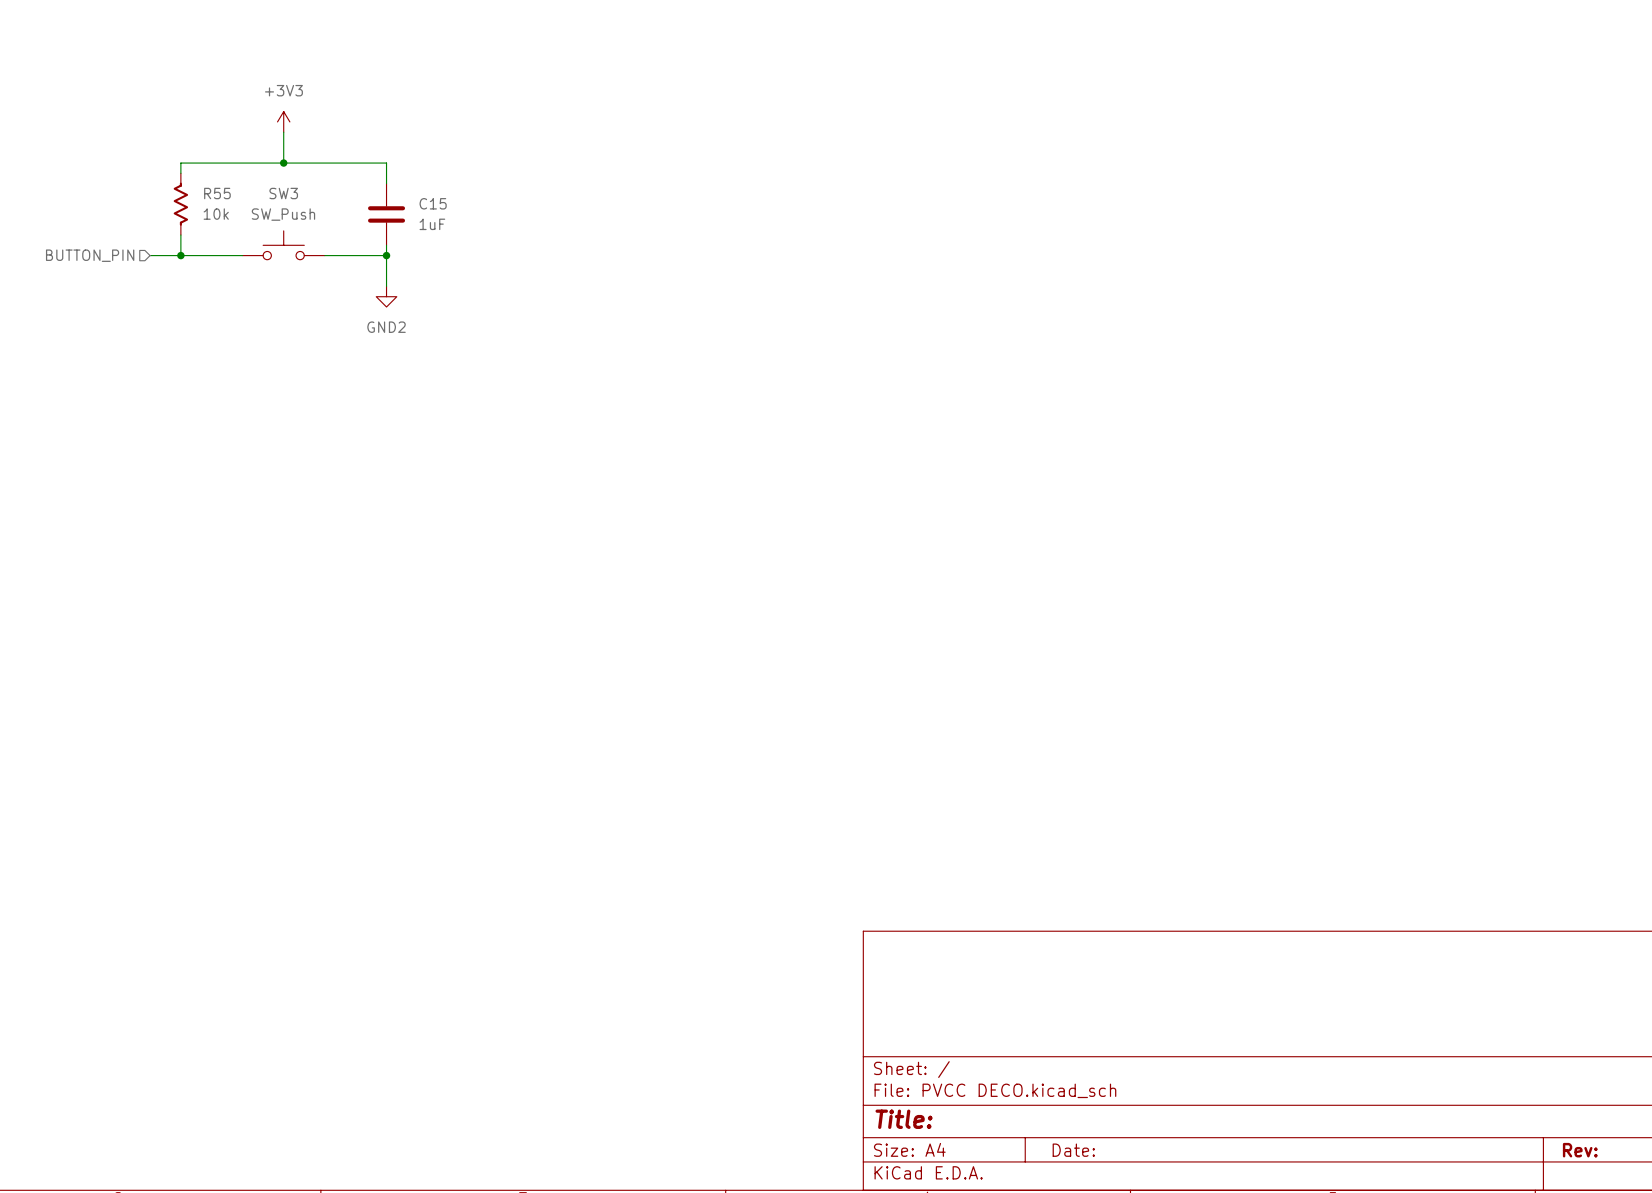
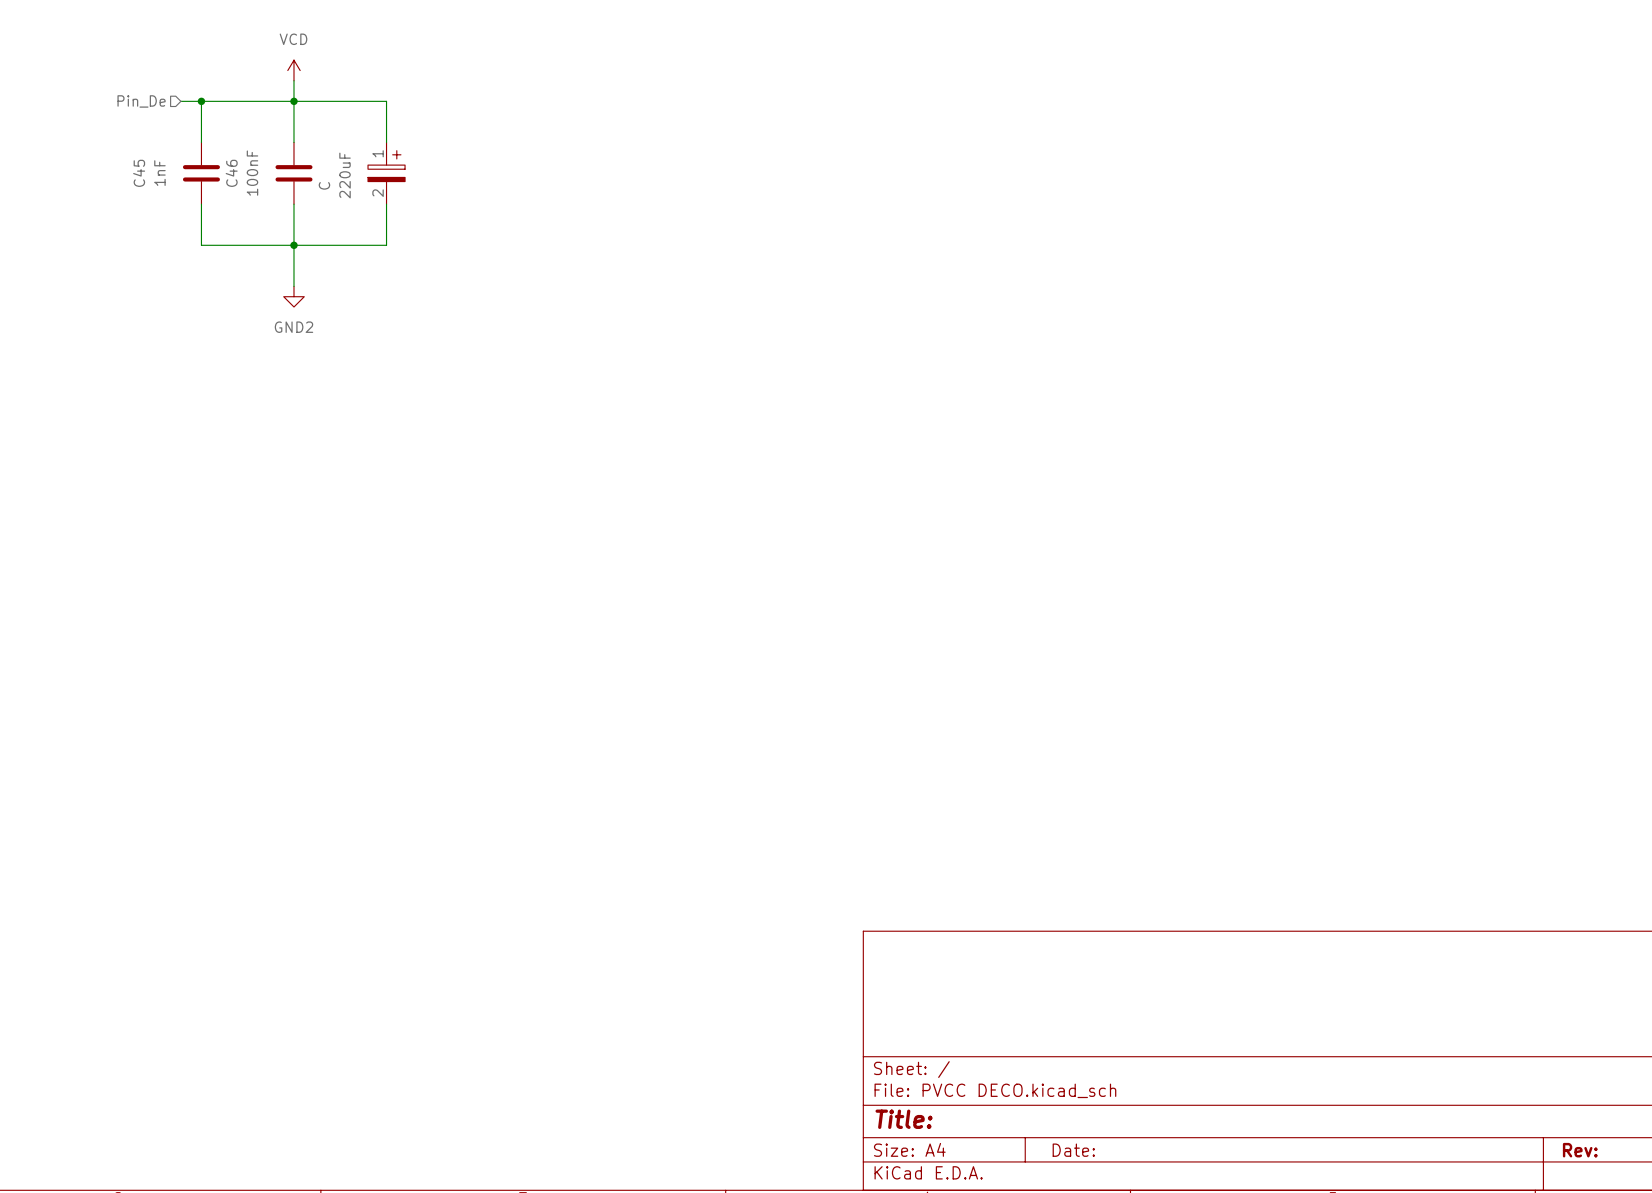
power symbol: none -> VCD (293, 70)
wire: none -> (293, 80) (293, 142)
hierarchical label: none -> Pin_De (141, 101)
wire: none -> (180, 101) (386, 101) (386, 142)
wire: none -> (201, 101) (201, 142)
junction: none -> (201, 101)
junction: none -> (293, 101)
power symbol: +3V3 (283, 121) -> none
wire: (283, 132) (283, 163) -> none
junction: (283, 163) -> none
wire: (180, 173) (180, 163) (386, 163) (386, 183) -> none
C45: none -> 1nF (201, 173)
C46: none -> 100nF (293, 173)
C: none -> 220uF (386, 173)
R55: 10k (180, 204) -> none
wire: none -> (201, 204) (201, 245) (386, 245) (386, 204)
wire: none -> (293, 204) (293, 286)
C15: 1uF (386, 214) -> none
wire: (180, 235) (180, 255) -> none
SW3: SW_Push (283, 245) -> none
junction: none -> (293, 245)
wire: (386, 245) (386, 286) -> none
hierarchical label: BUTTON_PIN (90, 255) -> none
wire: (150, 255) (242, 255) -> none
junction: (180, 255) -> none
wire: (324, 255) (386, 255) -> none
junction: (386, 255) -> none
power symbol position: GND2 (386, 296) -> GND2 (293, 296)

